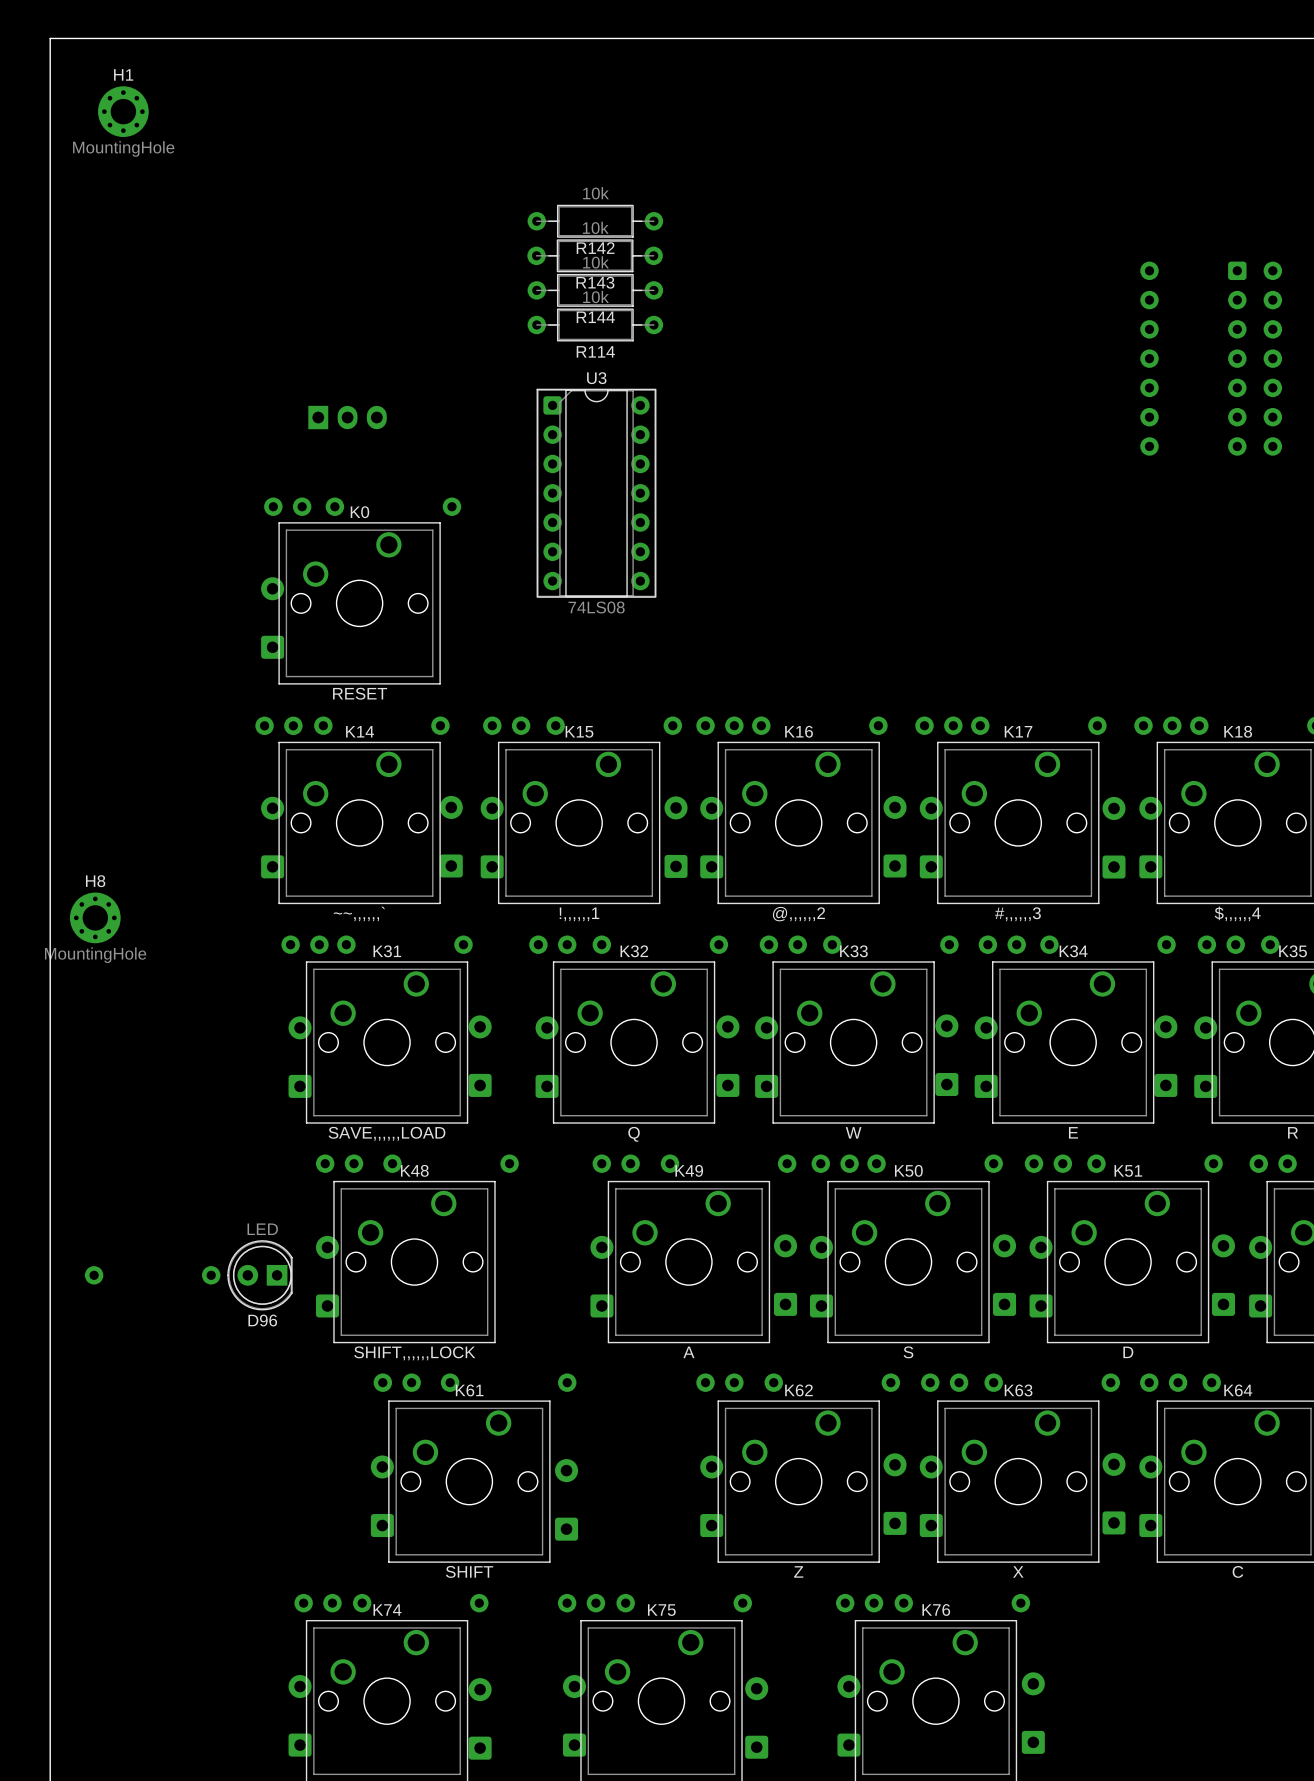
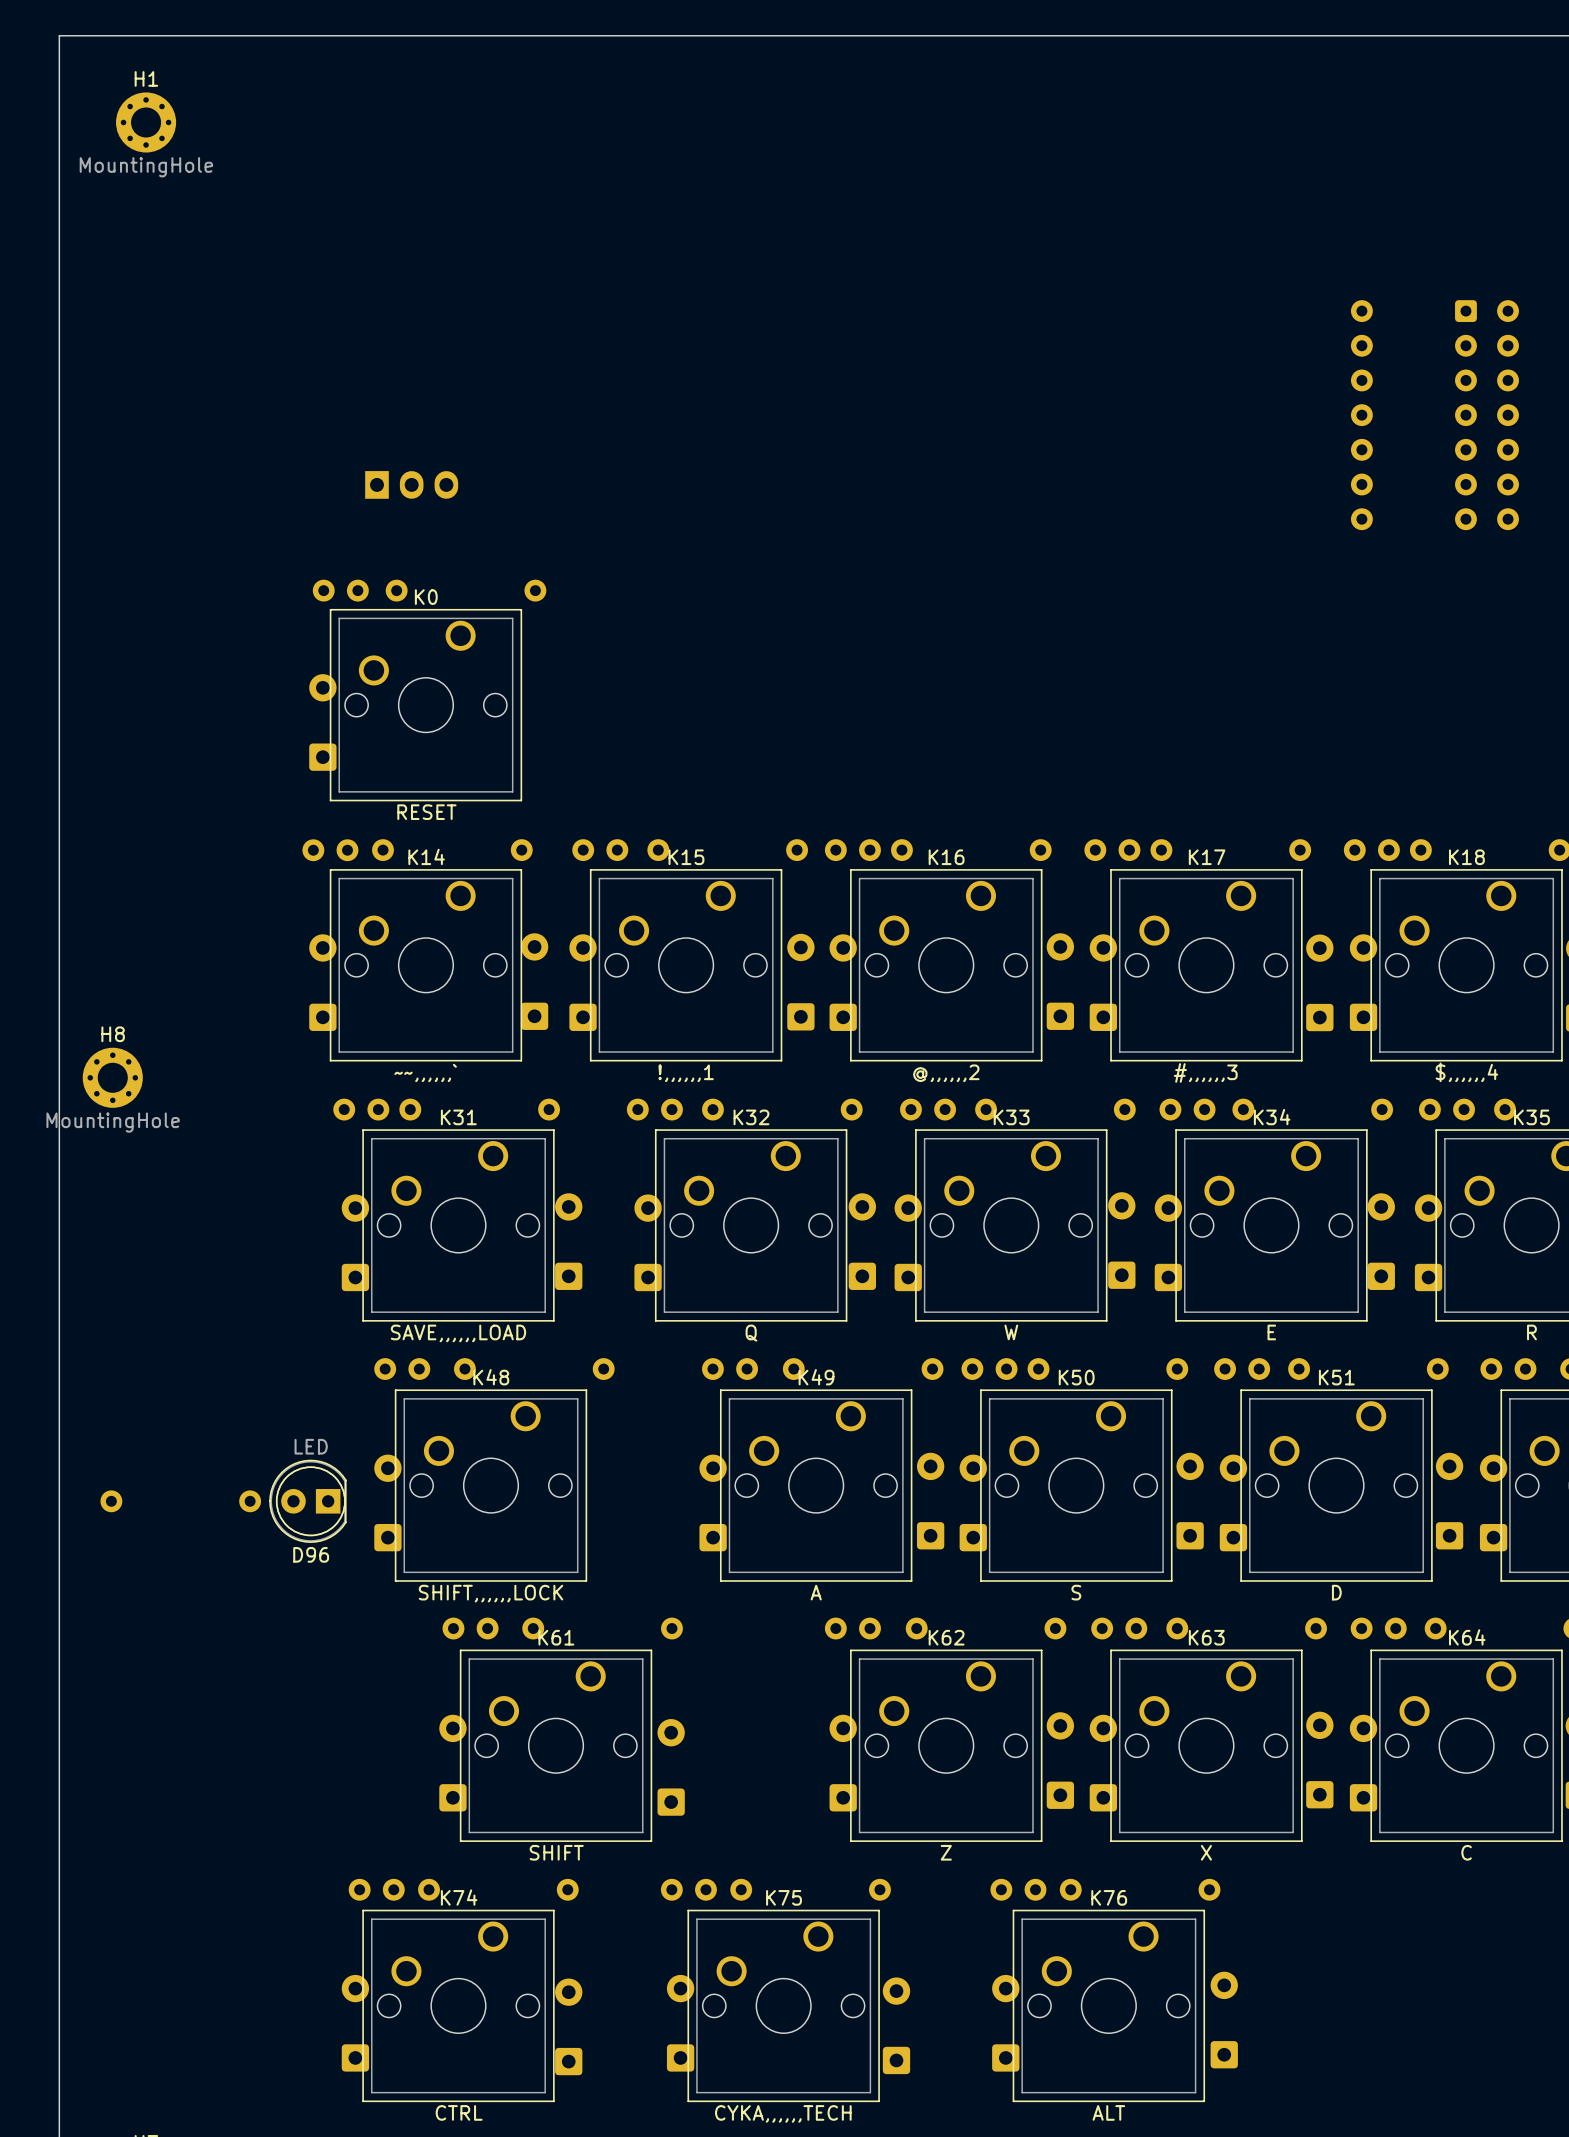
R142: 10k (595, 221) -> none
R143: 10k (595, 255) -> none
R144: 10k (595, 290) -> none
R114: 10k (595, 324) -> none
U3: 74LS08 (596, 493) -> none

